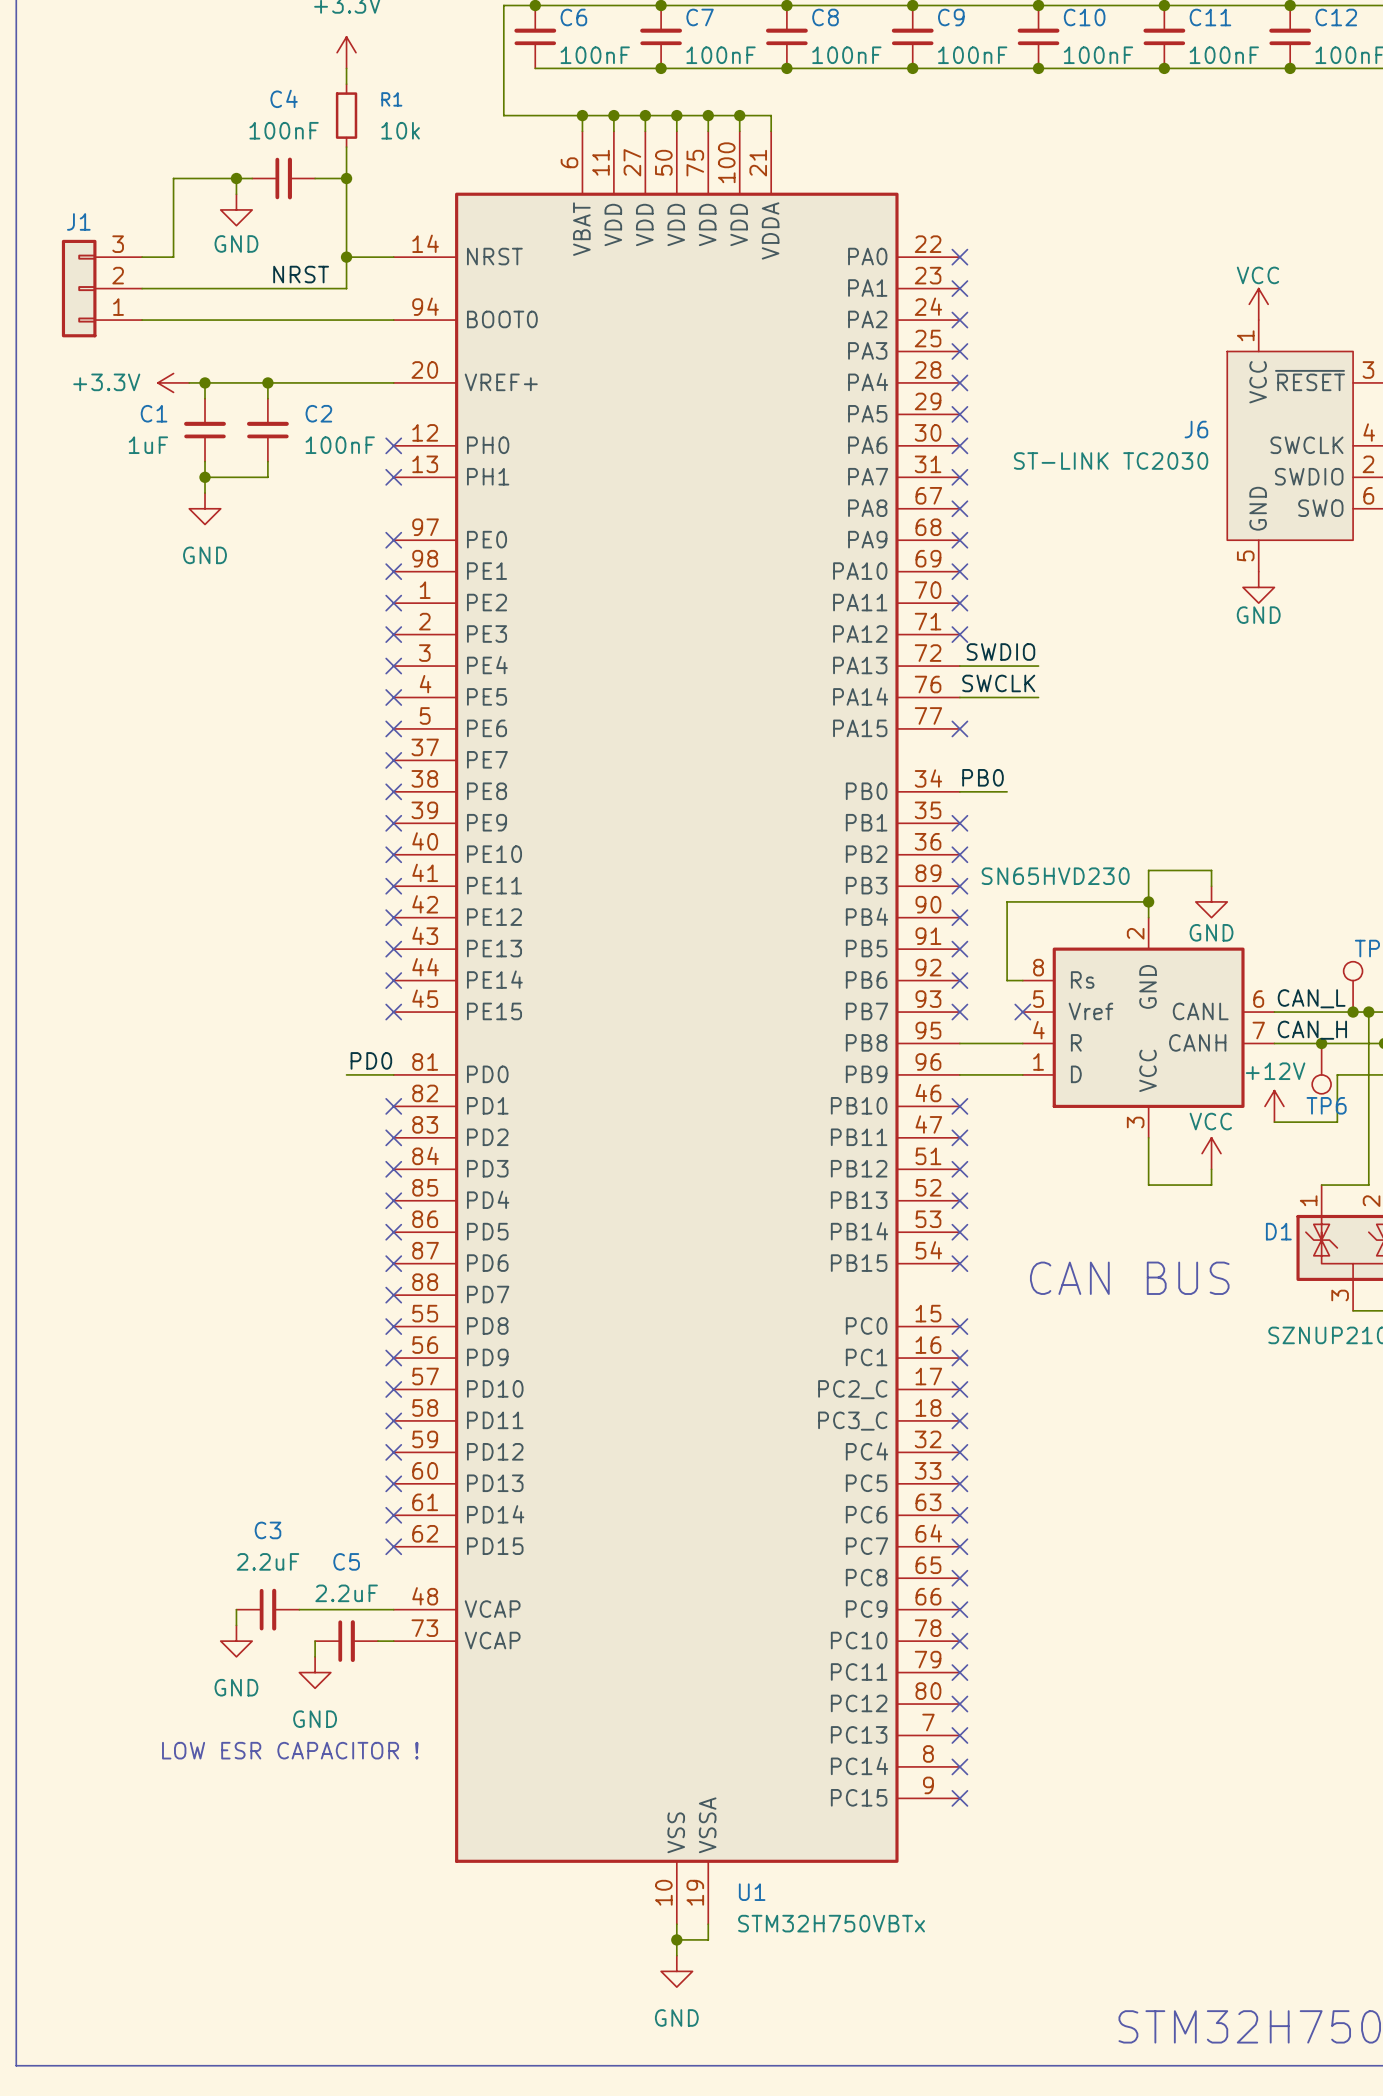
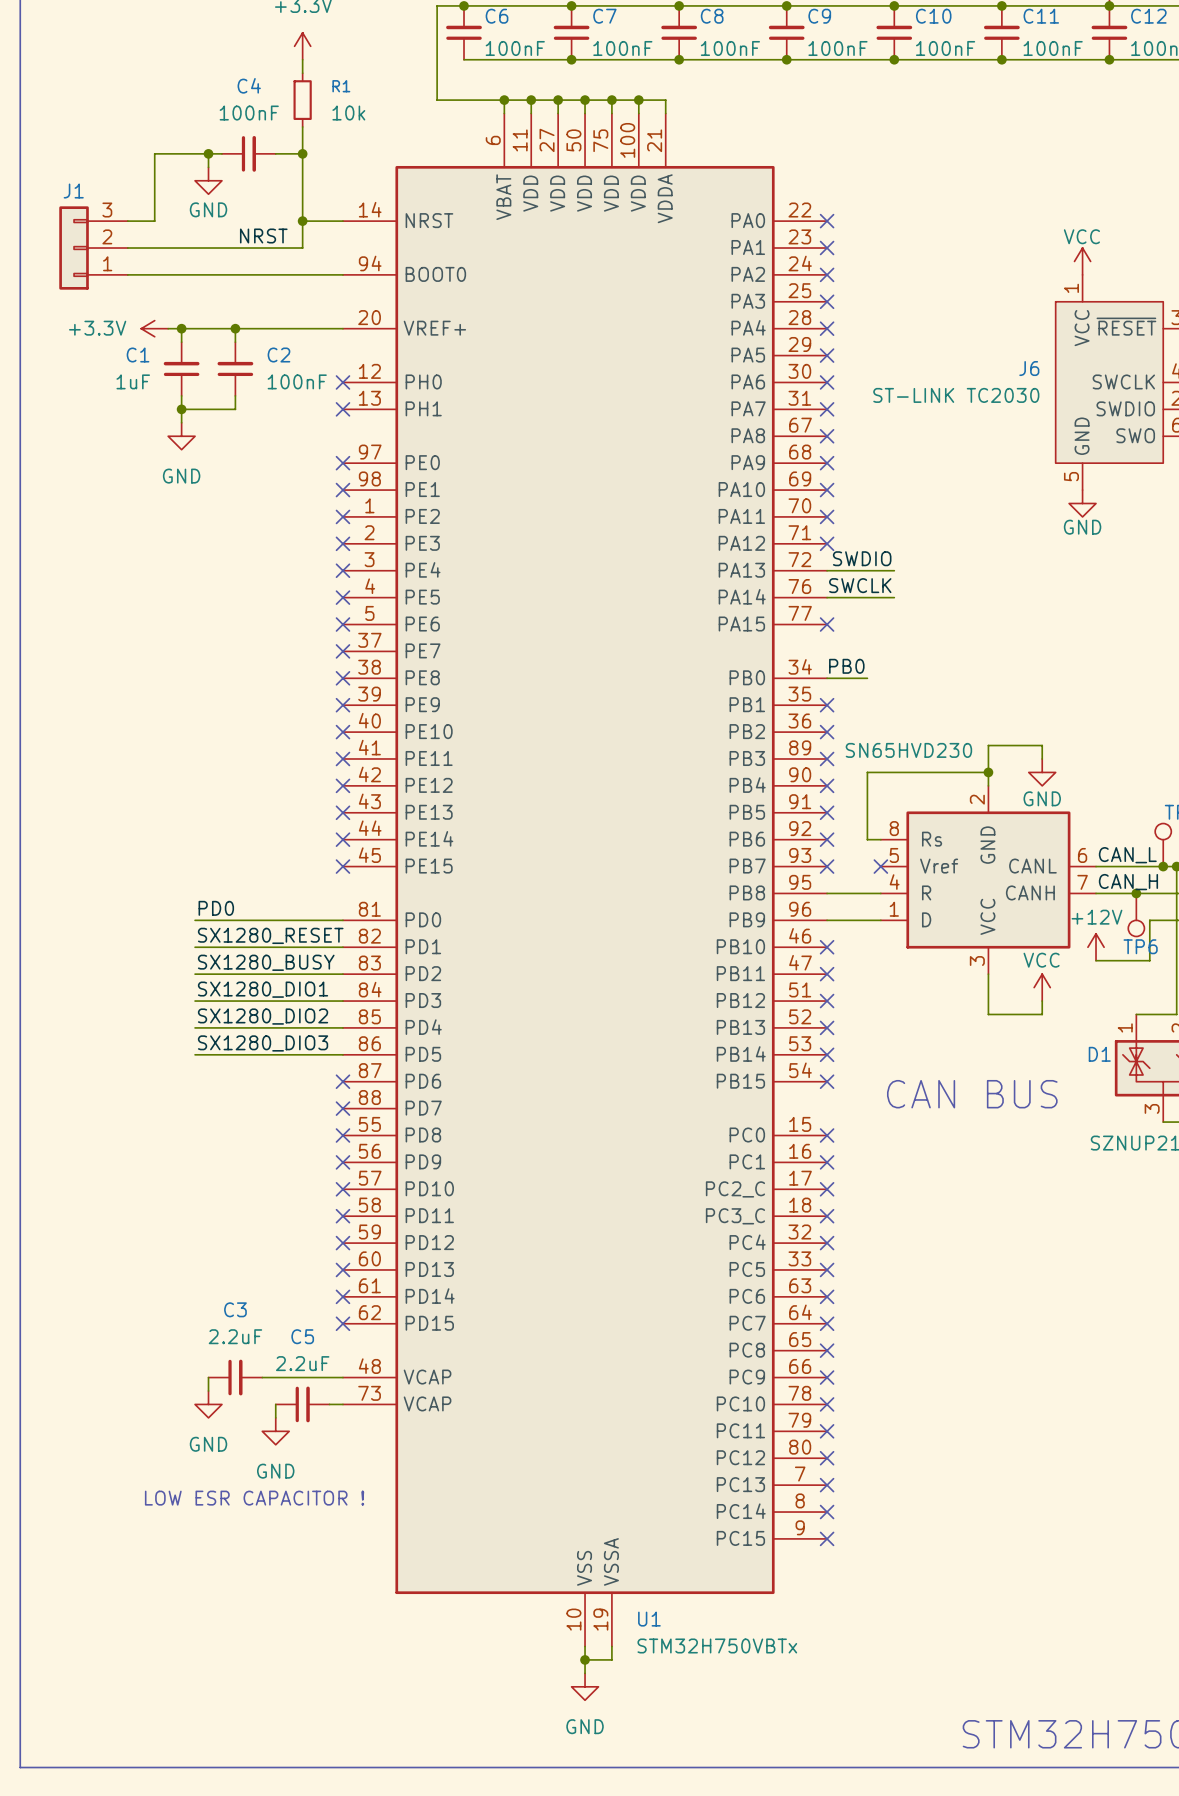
label position: PD0 (371, 1060) -> PD0 (216, 908)
wire: none -> (195, 920) (302, 920)
label: none -> SX1280_RESET (270, 935)
wire: none -> (195, 947) (342, 947)
no-connect mark: (393, 1106) -> none
label: none -> SX1280_BUSY (266, 962)
wire: none -> (195, 974) (342, 974)
no-connect mark: (393, 1137) -> none
label: none -> SX1280_DIO1 (263, 989)
wire: none -> (195, 1001) (342, 1001)
no-connect mark: (393, 1169) -> none
label: none -> SX1280_DIO2 (263, 1016)
wire: none -> (195, 1027) (342, 1027)
no-connect mark: (393, 1200) -> none
label: none -> SX1280_DIO3 (263, 1043)
wire: none -> (195, 1054) (342, 1054)
no-connect mark: (393, 1232) -> none

